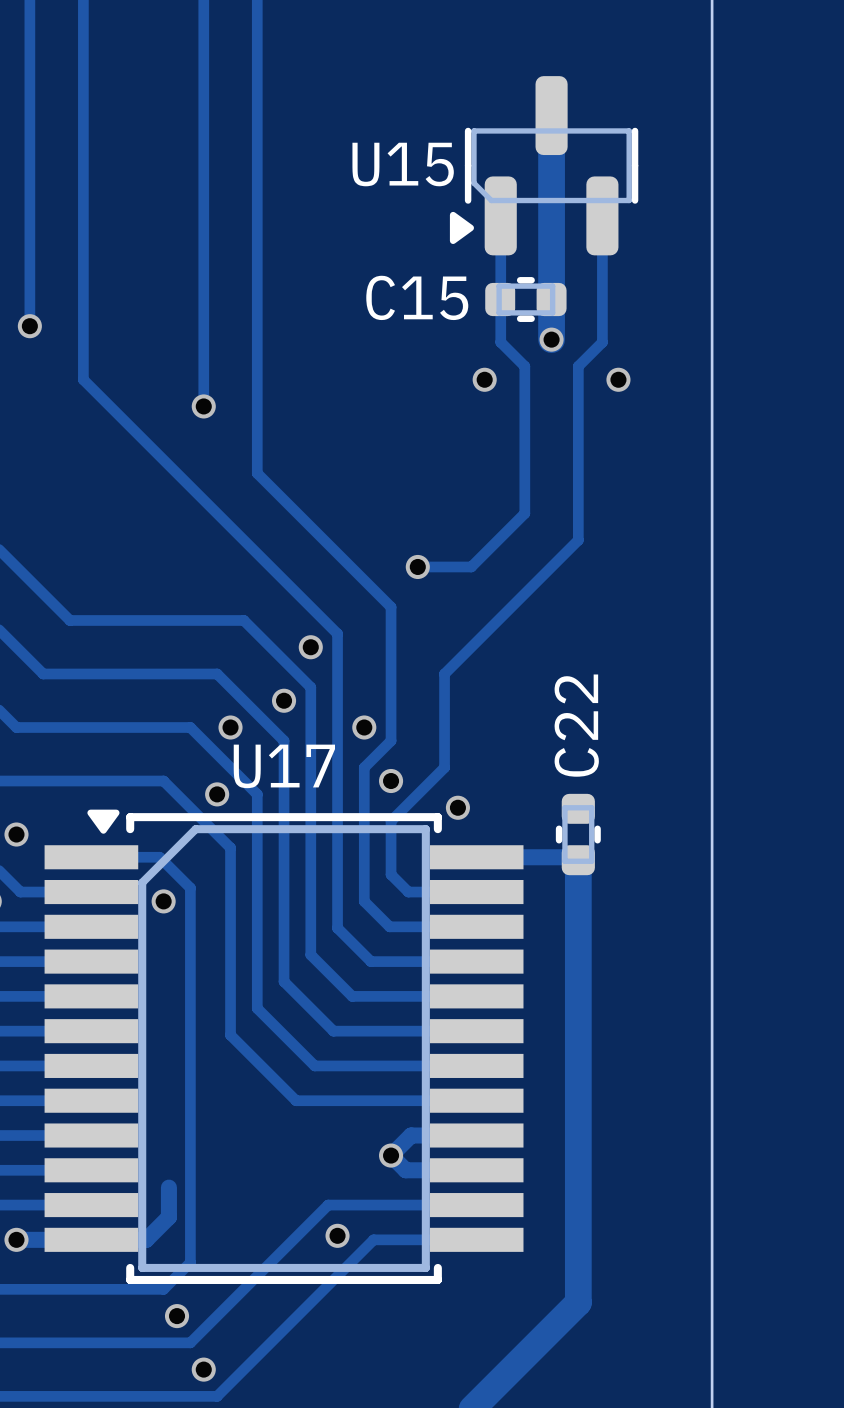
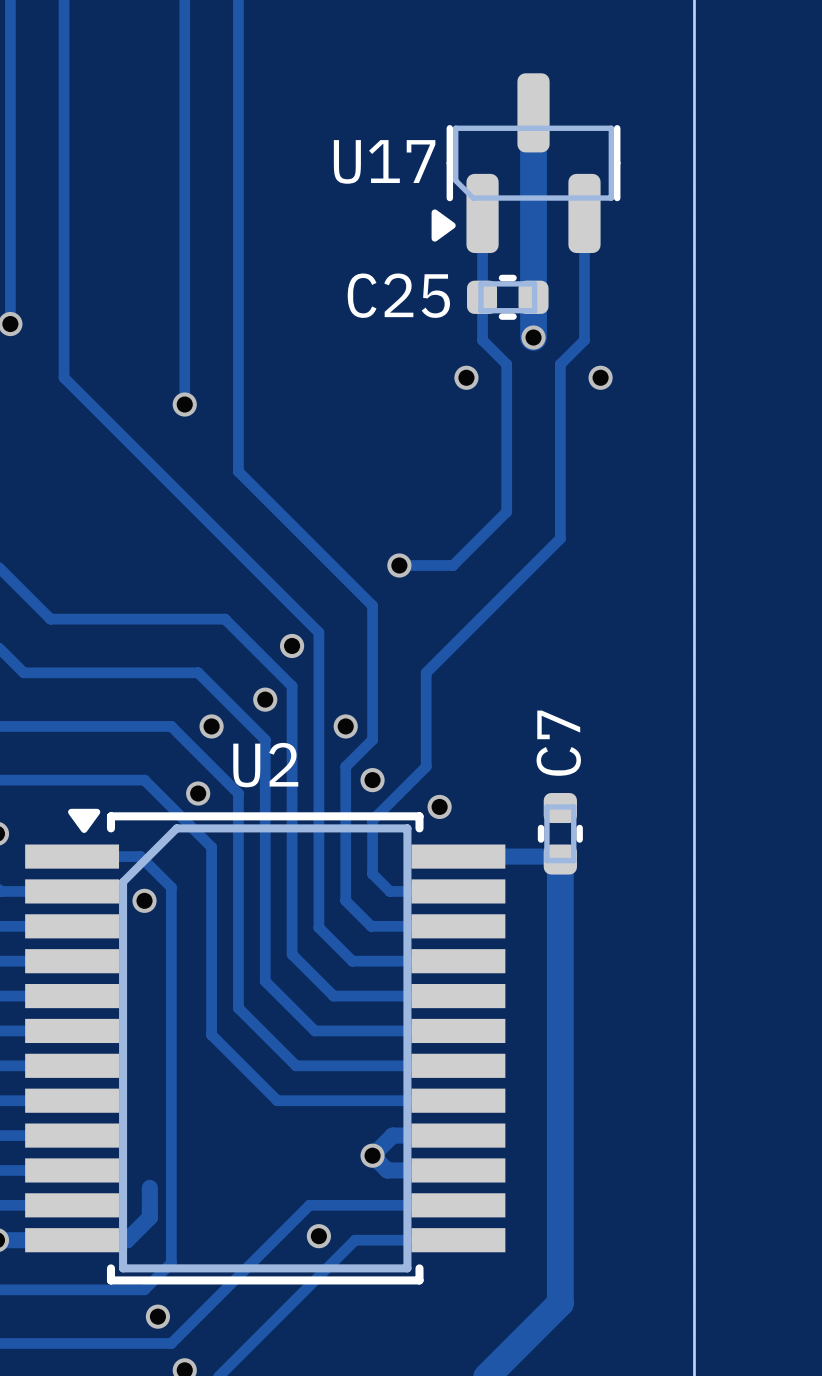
U15 name: U15 (403, 164) -> U17 (384, 161)
C15 name: C15 (417, 297) -> C25 (398, 295)
C22 name: C22 (576, 725) -> C7 (558, 743)
U17 name: U17 (284, 766) -> U2 (265, 765)

